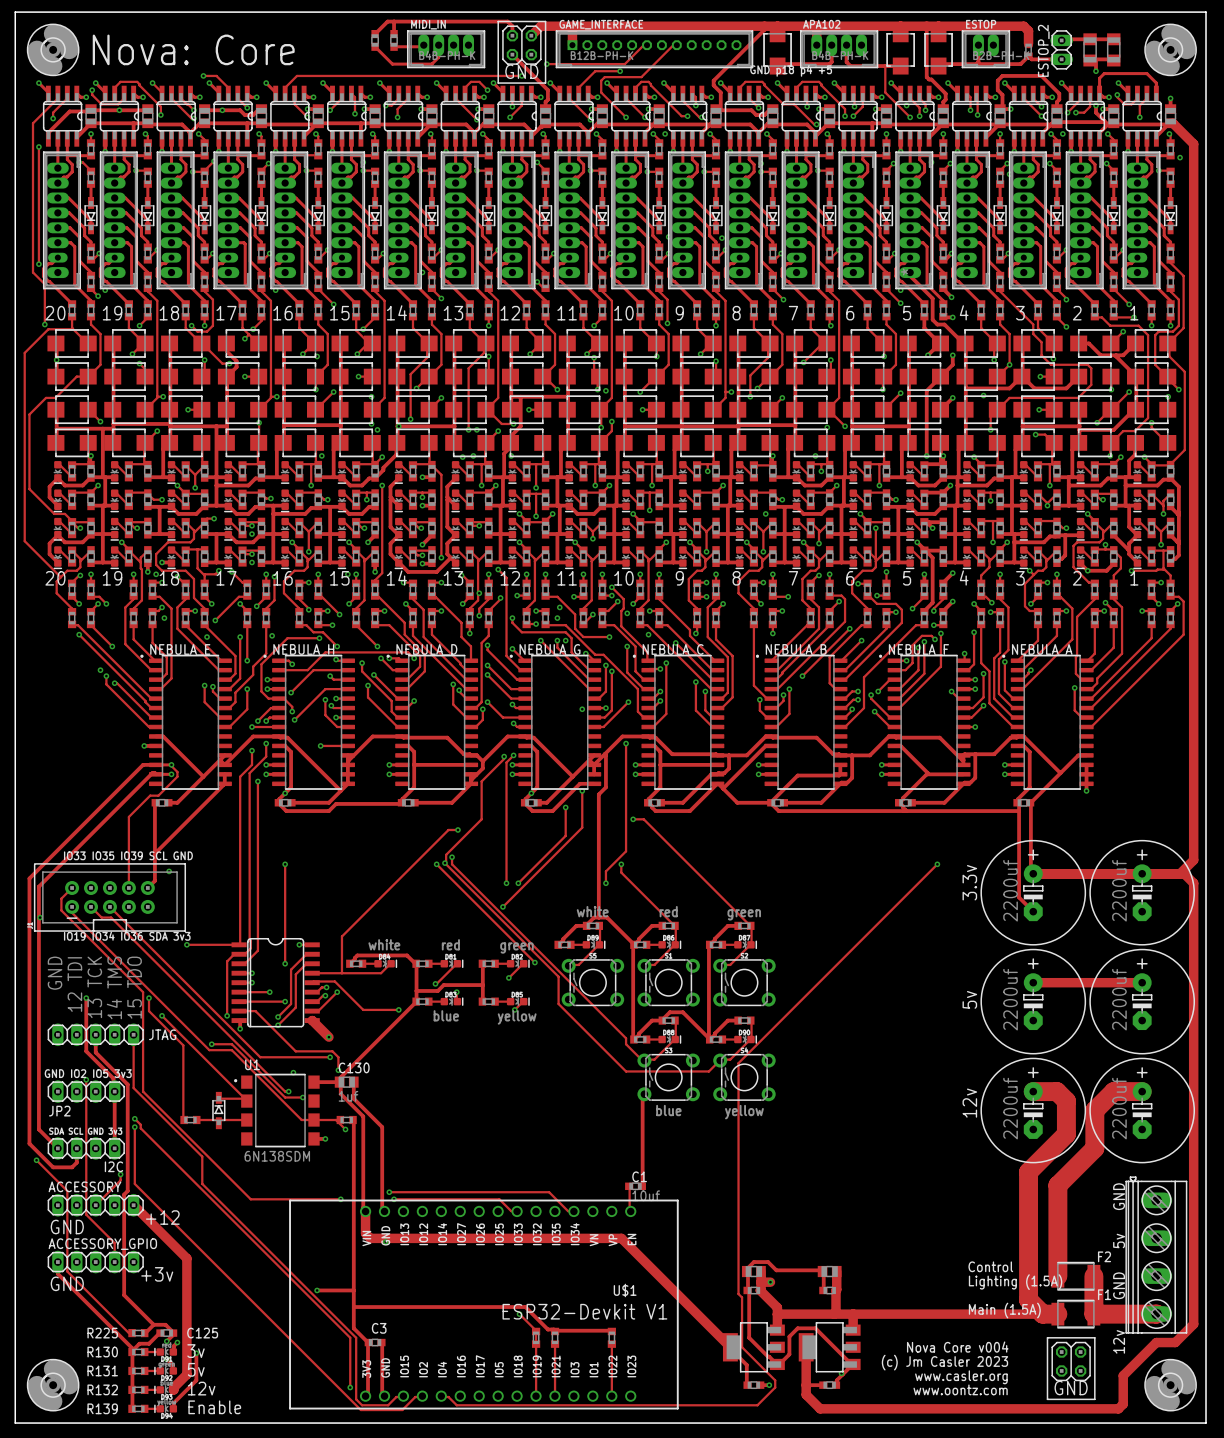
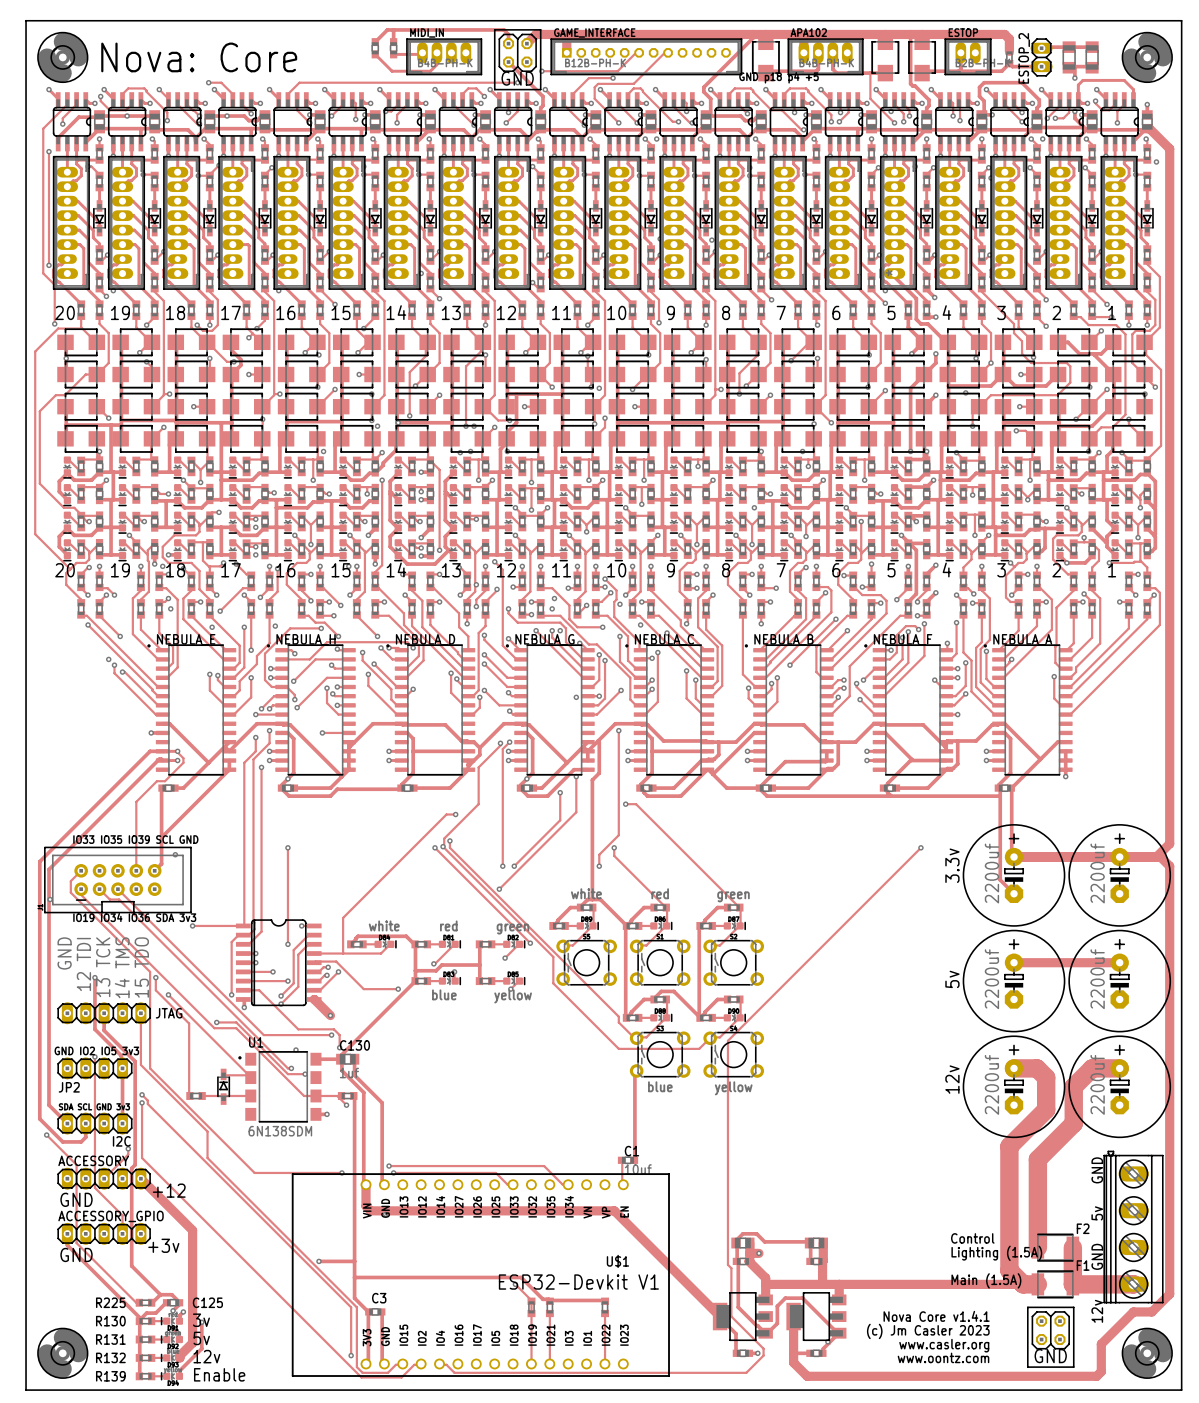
text: Nova Core v004 (957, 1347) -> Nova Core v1.4.1 (936, 1316)

